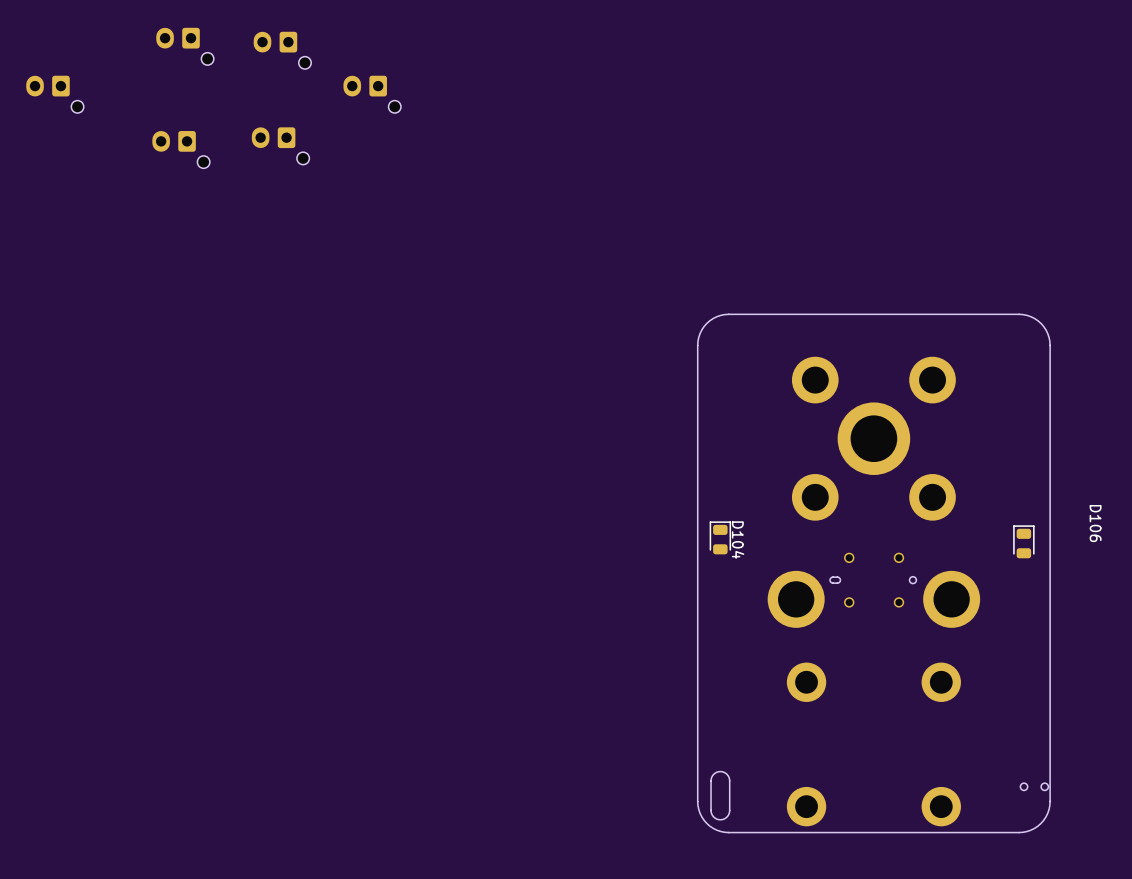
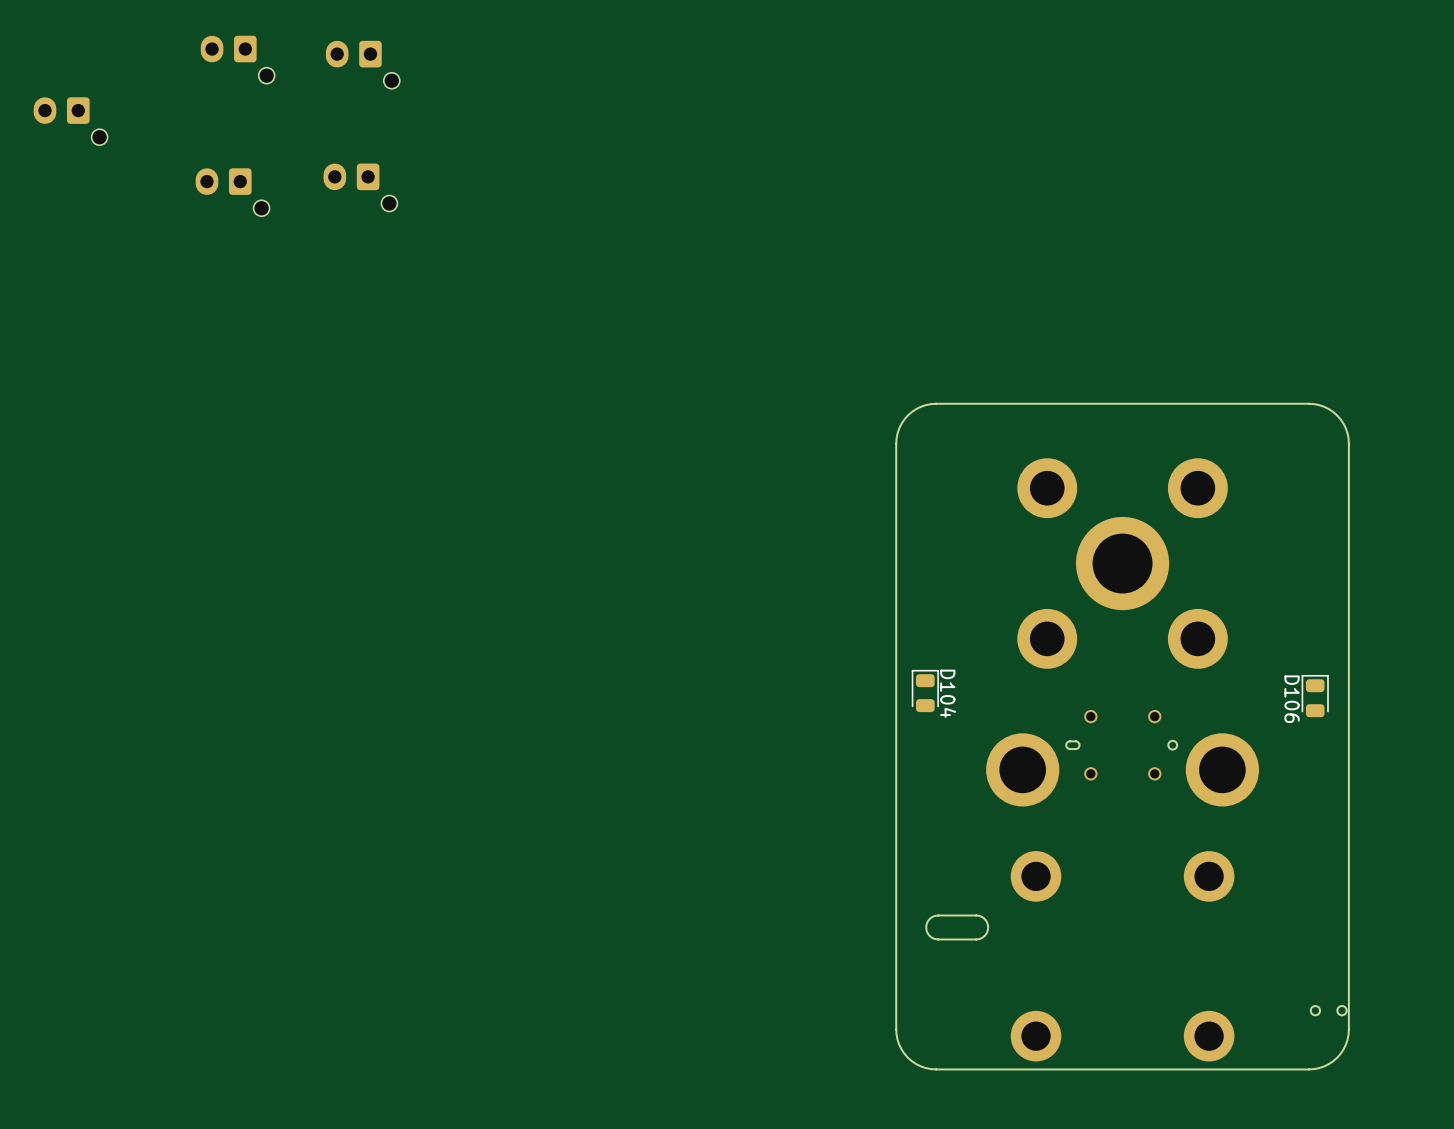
part: (372, 94) -> none
D106 name position: D106 (1095, 523) -> D106 (1292, 699)
part rotation: 0° (720, 795) -> 90° clockwise (957, 927)
part position: (720, 795) -> (957, 927)

